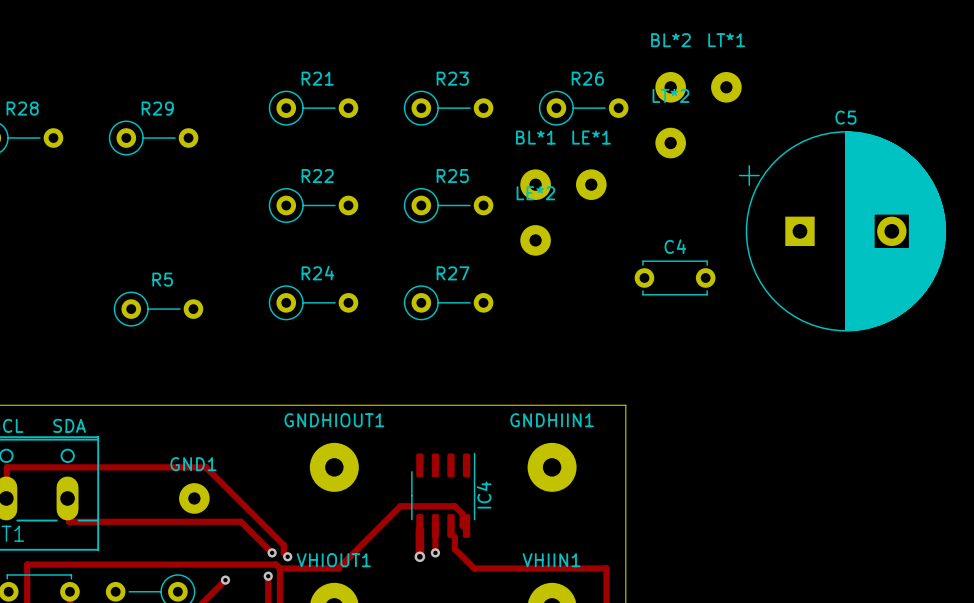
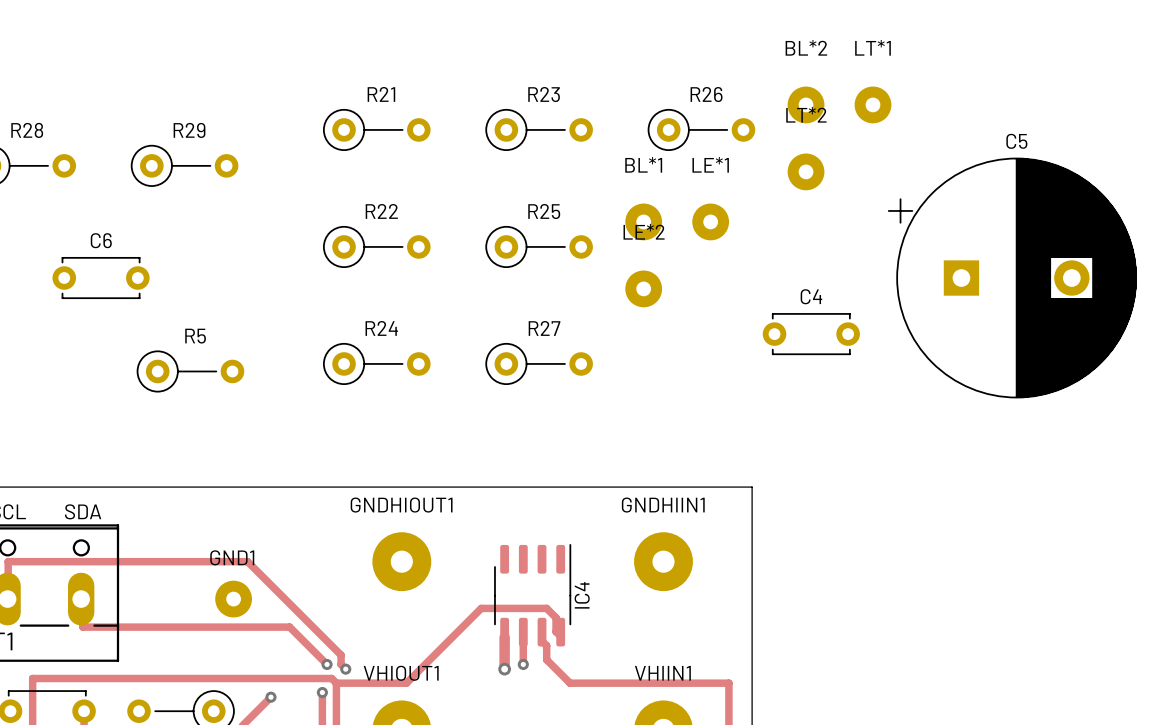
C6: none -> (101, 278)

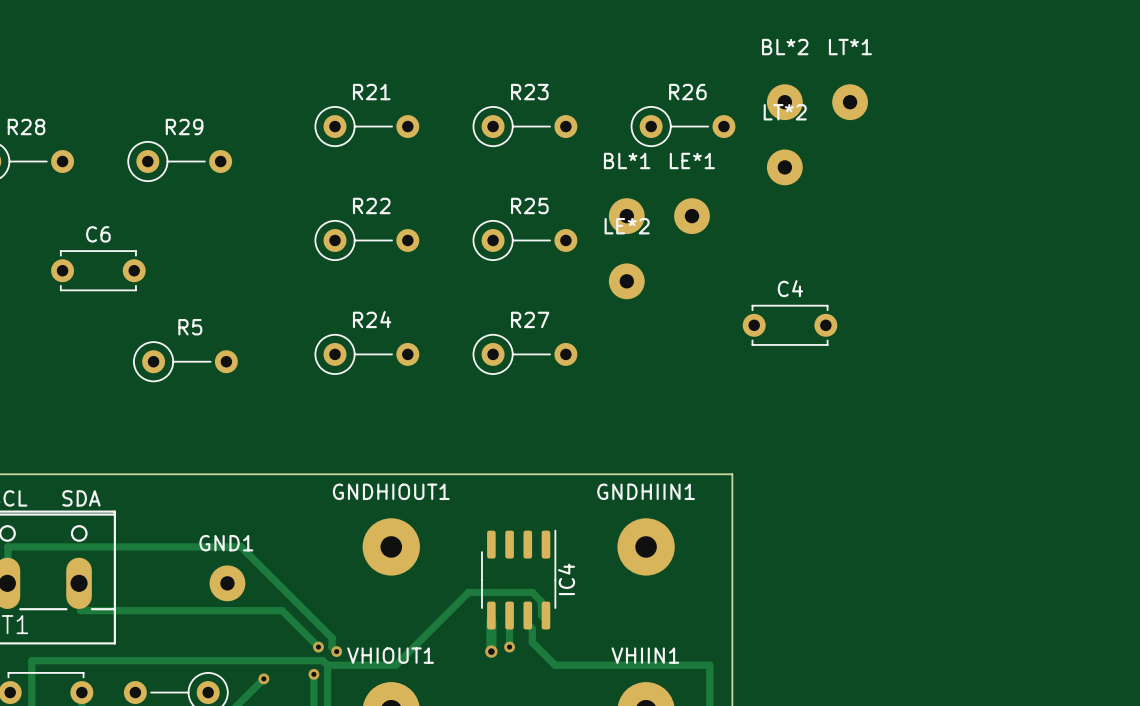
C5: (1012, 278) -> none

